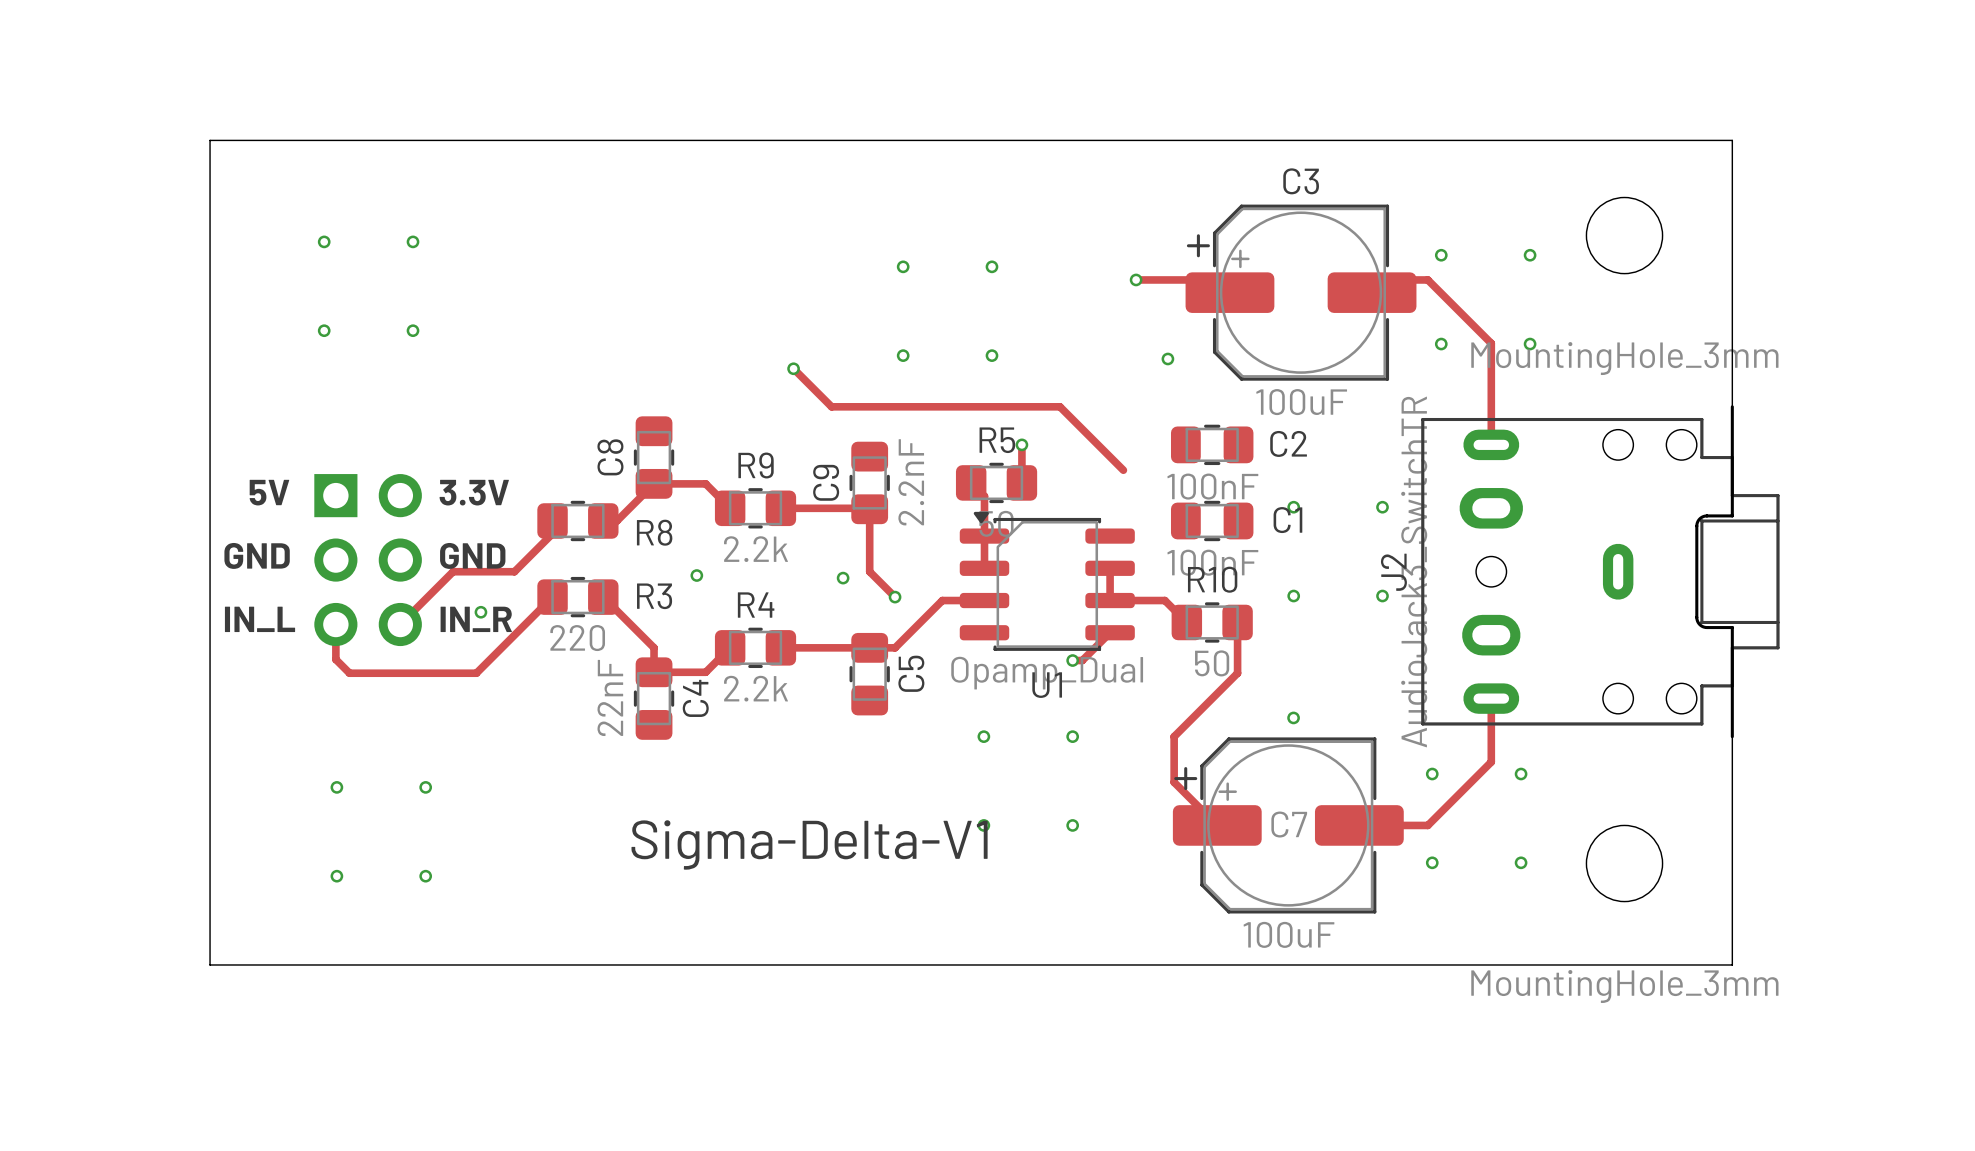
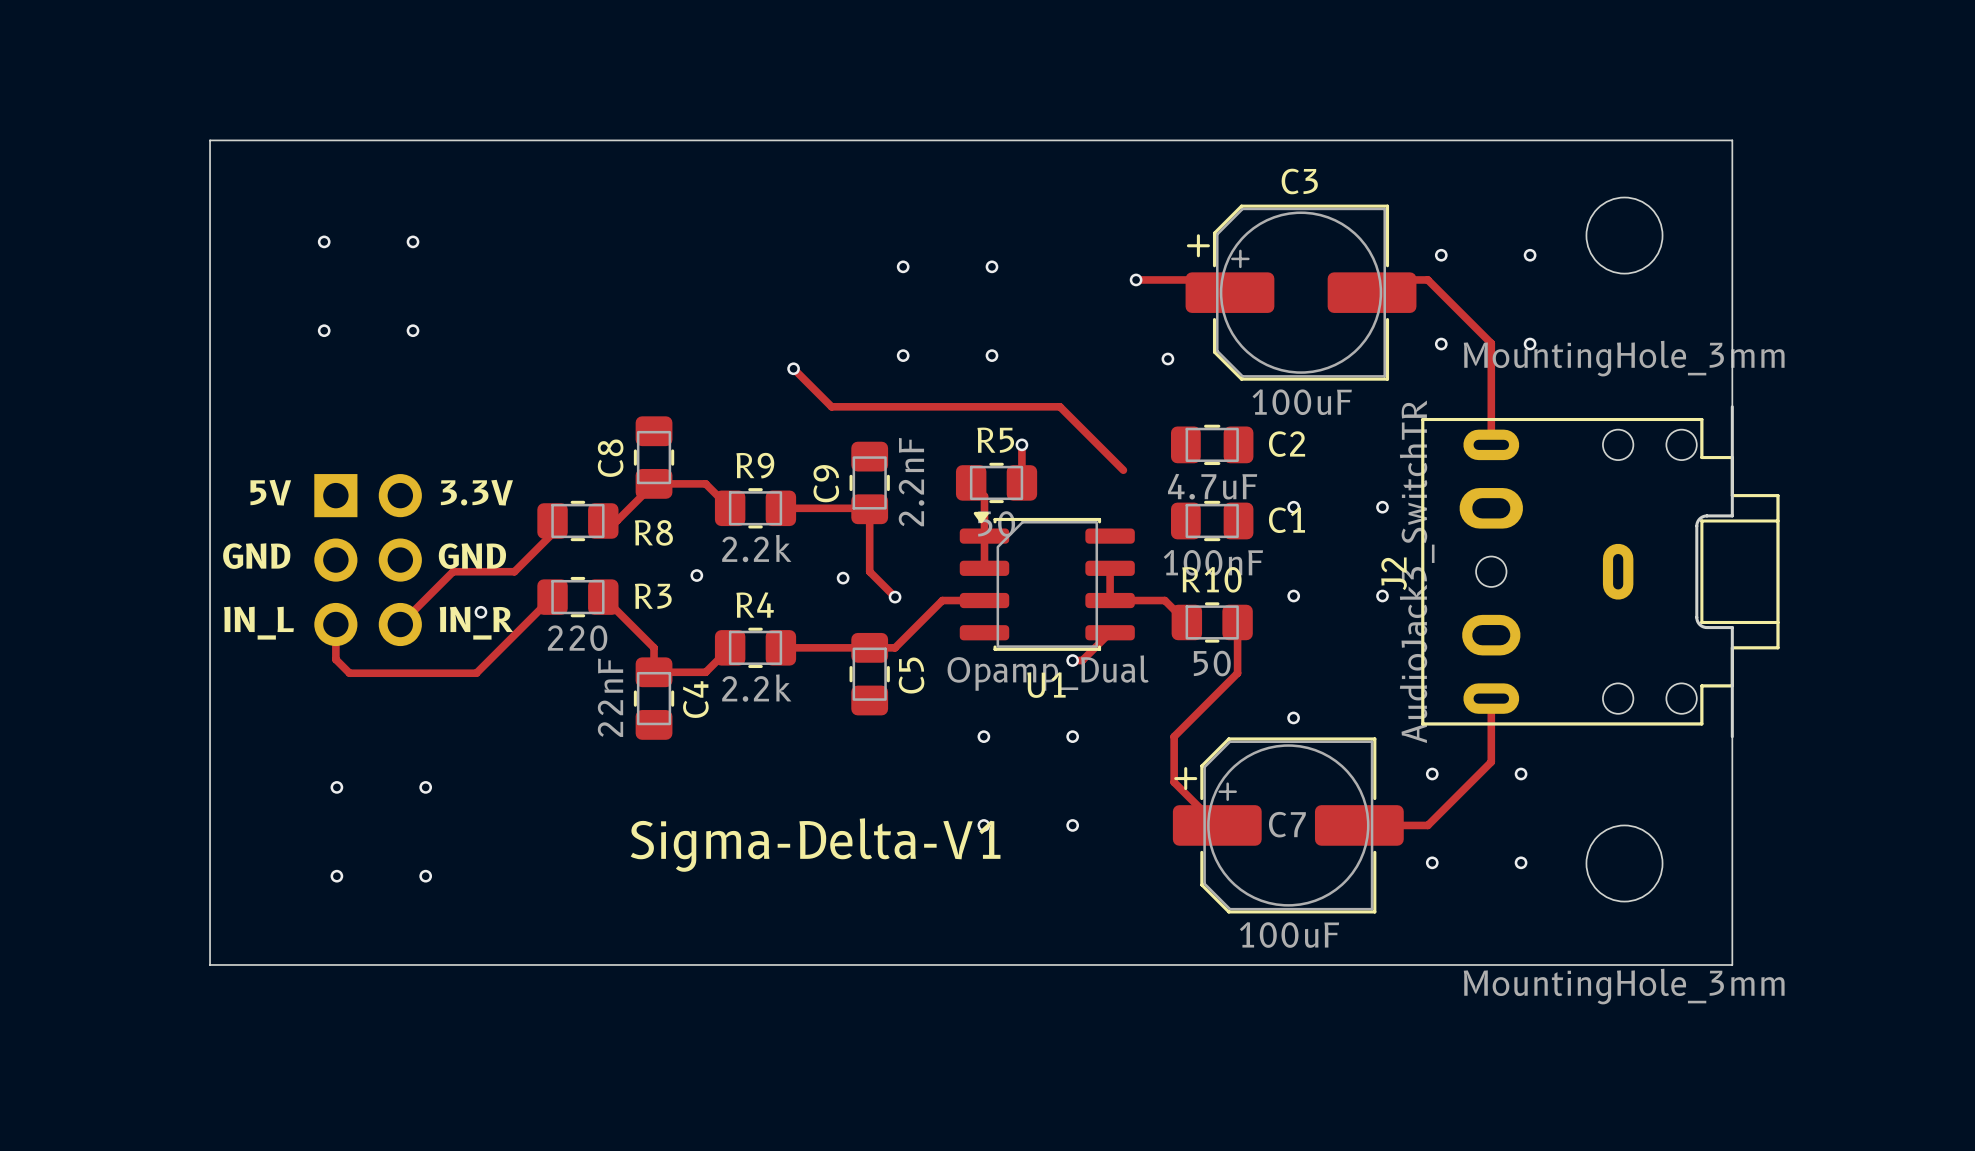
C2 value: 100nF (1212, 486) -> 4.7uF (1212, 486)

